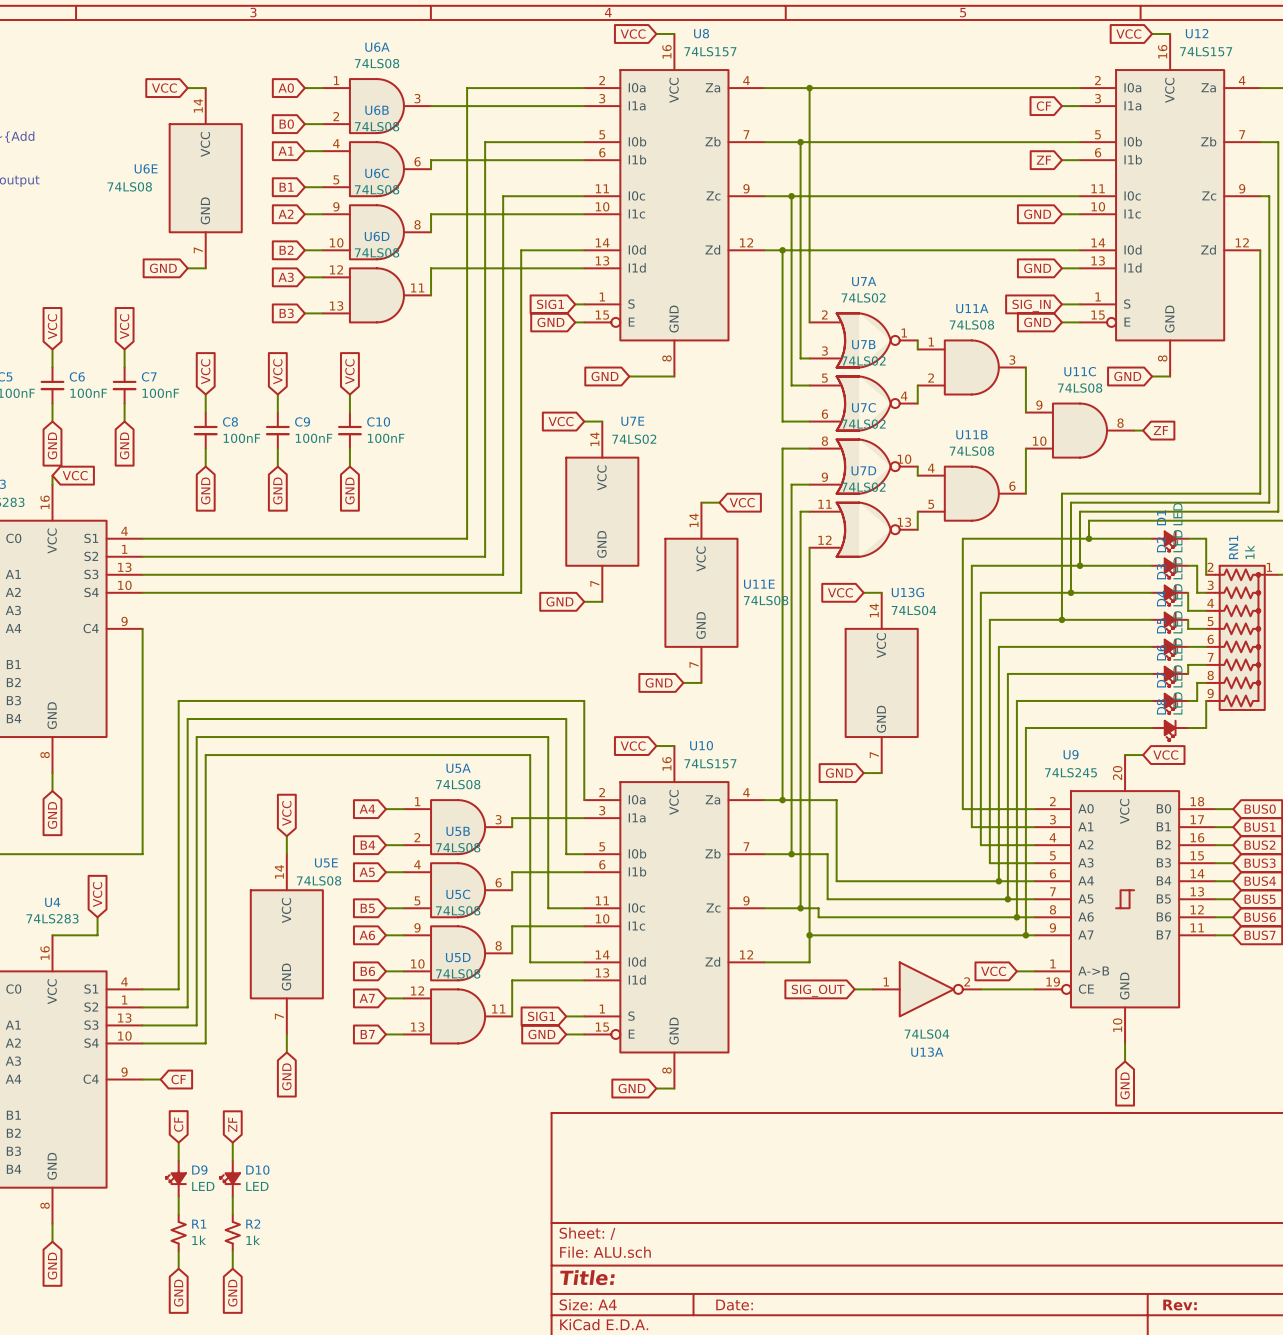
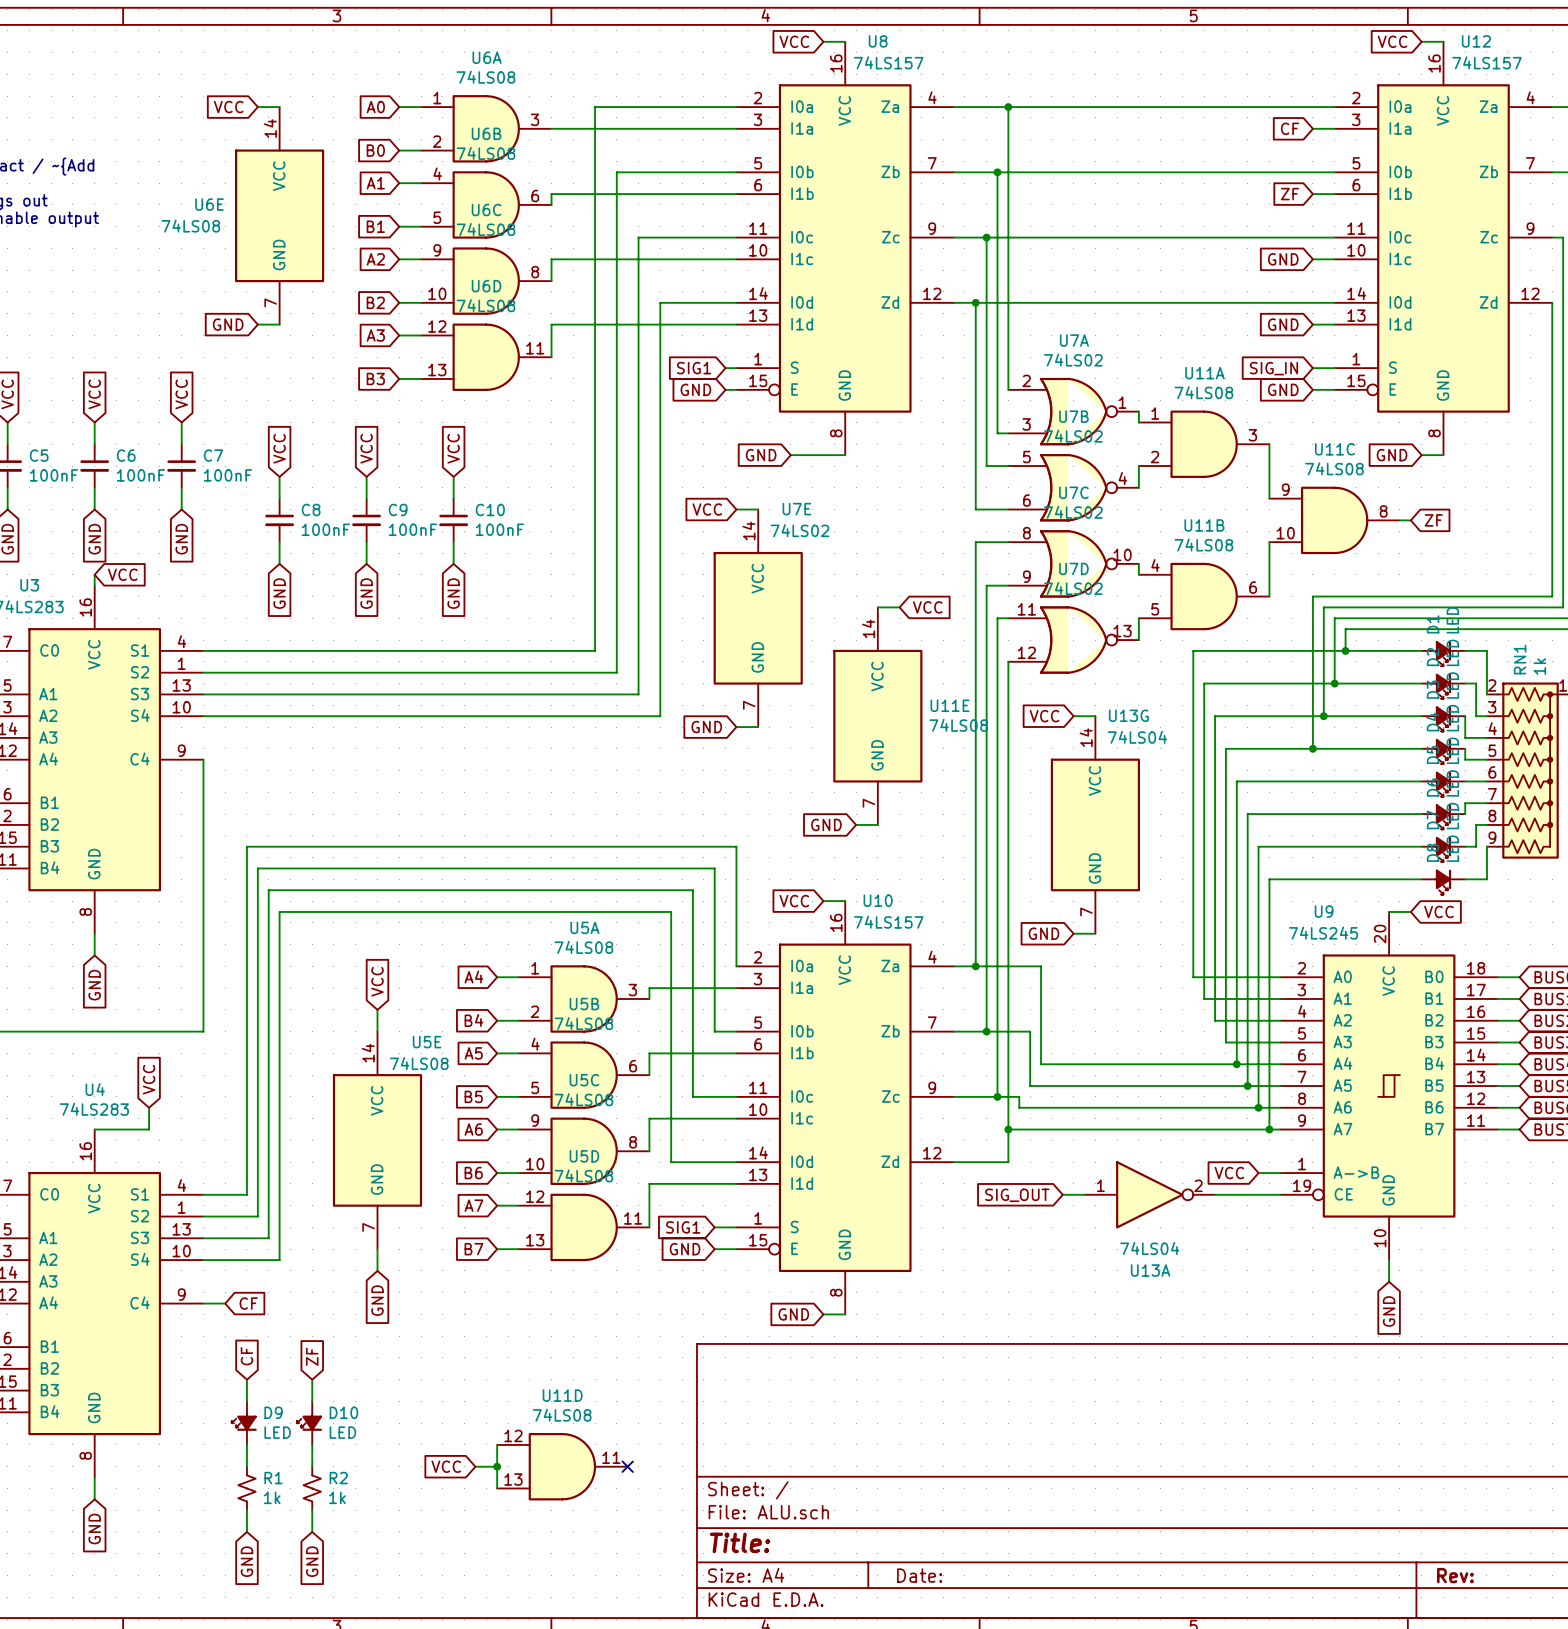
wire: none -> (497, 1444) (497, 1488)
global label: none -> VCC (446, 1466)
wire: none -> (475, 1466) (497, 1466)
junction: none -> (497, 1466)
U11D: none -> 74LS08 (562, 1466)
no-connect mark: none -> (627, 1466)

